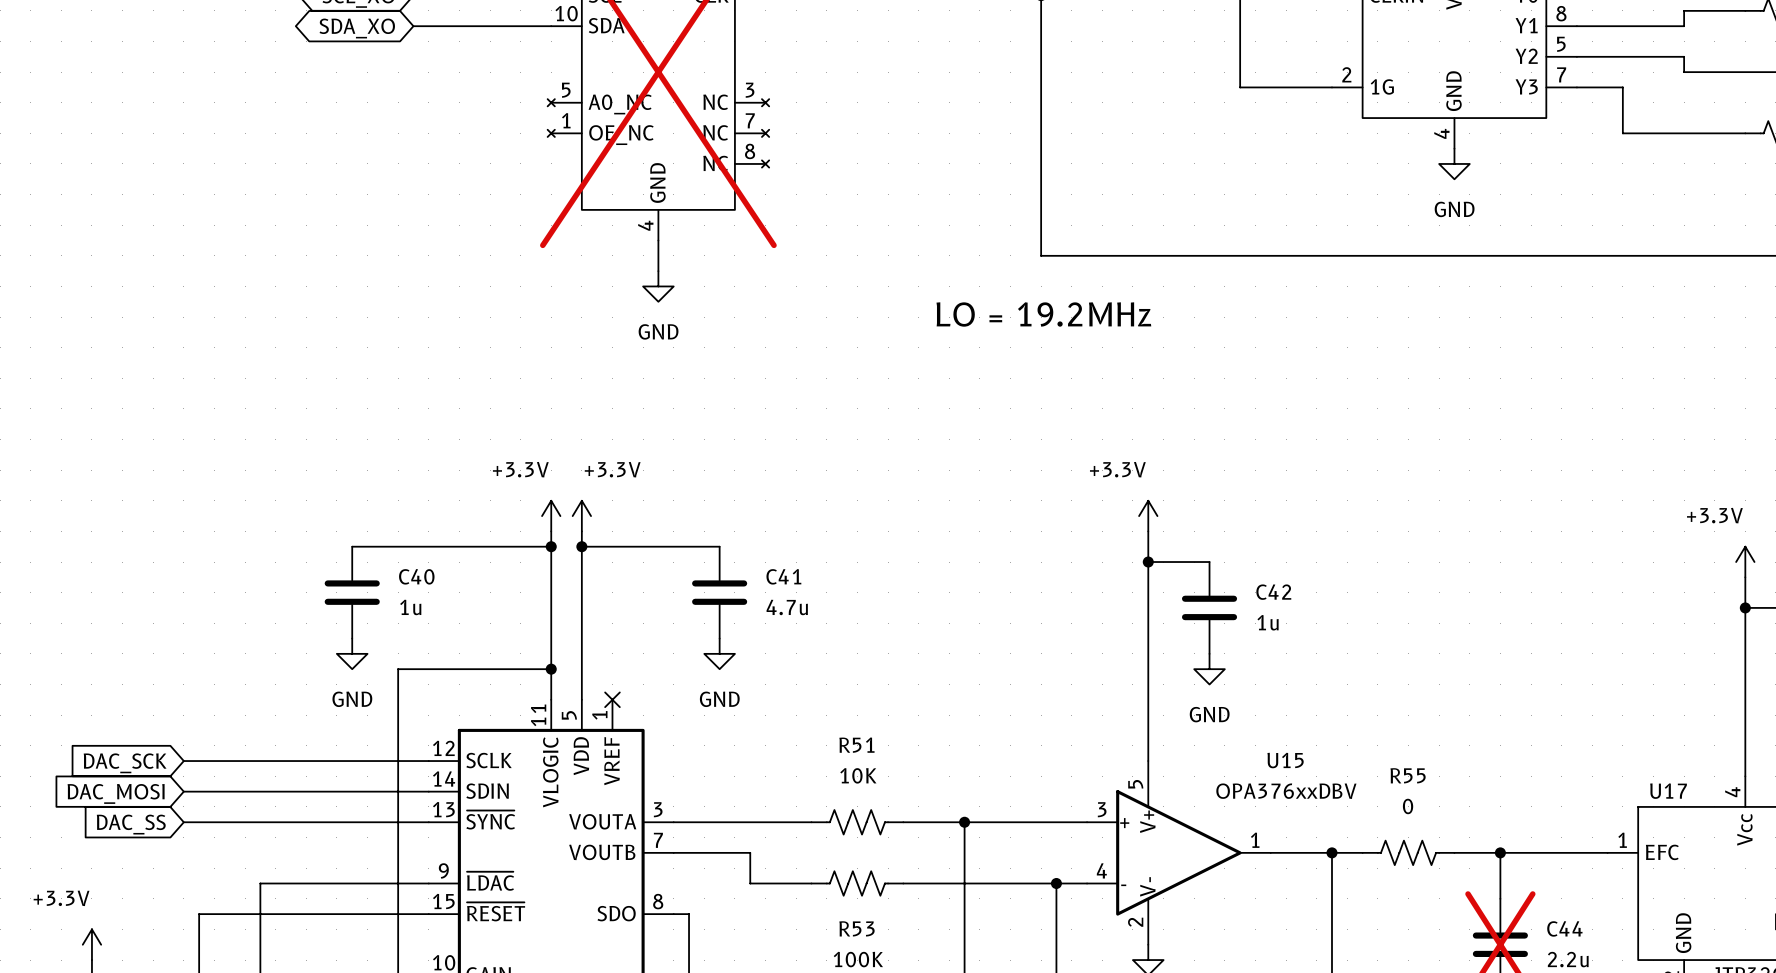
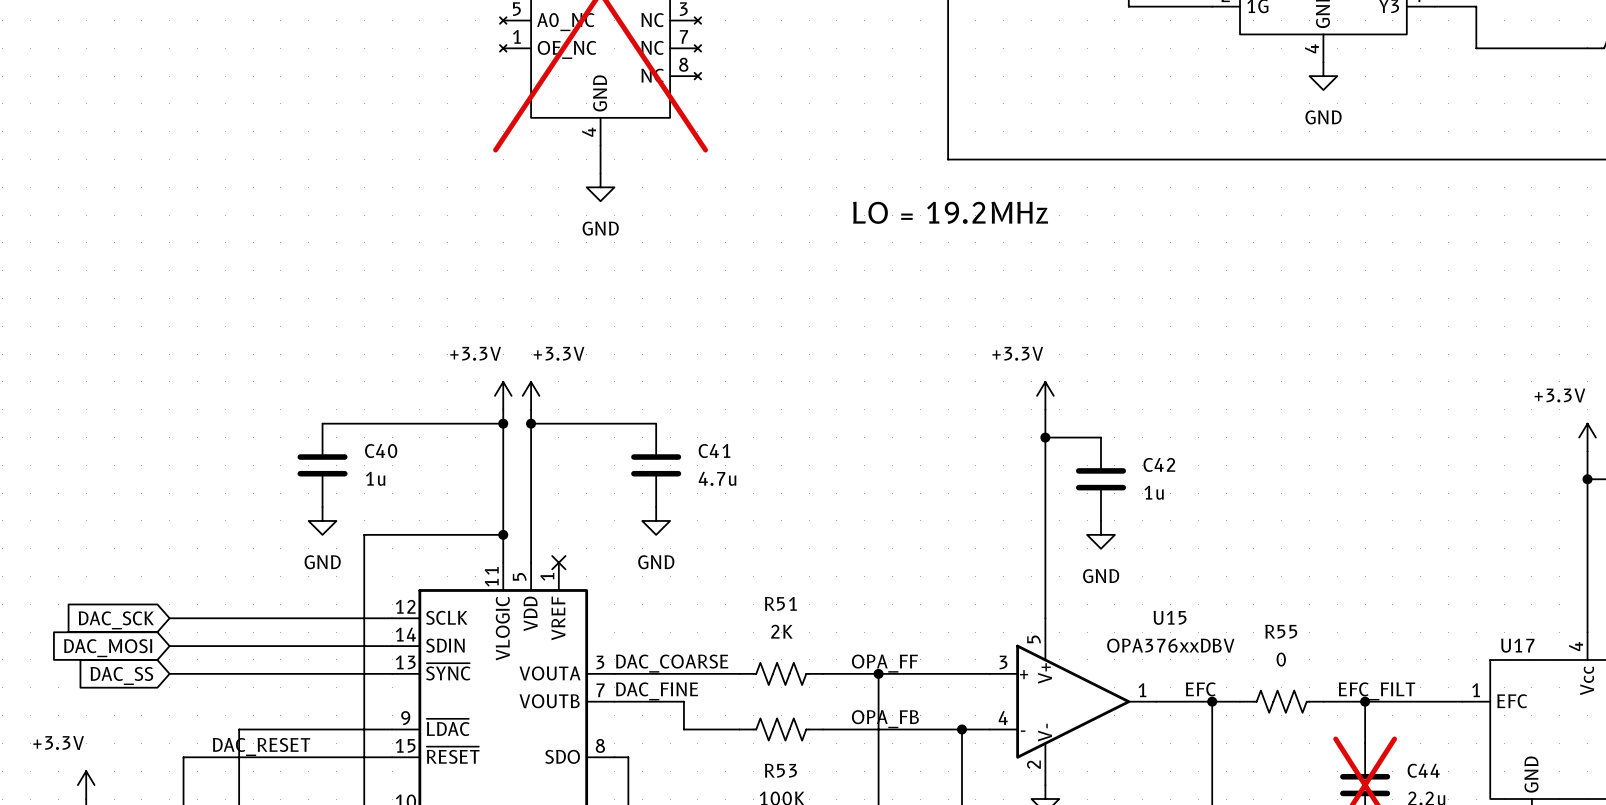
R51 value: 10K (858, 775) -> 2K (781, 631)
label: none -> DAC_COARSE (672, 663)
label: none -> OPA_FF (884, 663)
label: none -> EFC (1200, 689)
label: none -> DAC_FINE (657, 691)
label: none -> EFC_FILT (1376, 691)
label: none -> OPA_FB (885, 719)
label: none -> DAC_RESET (261, 746)

